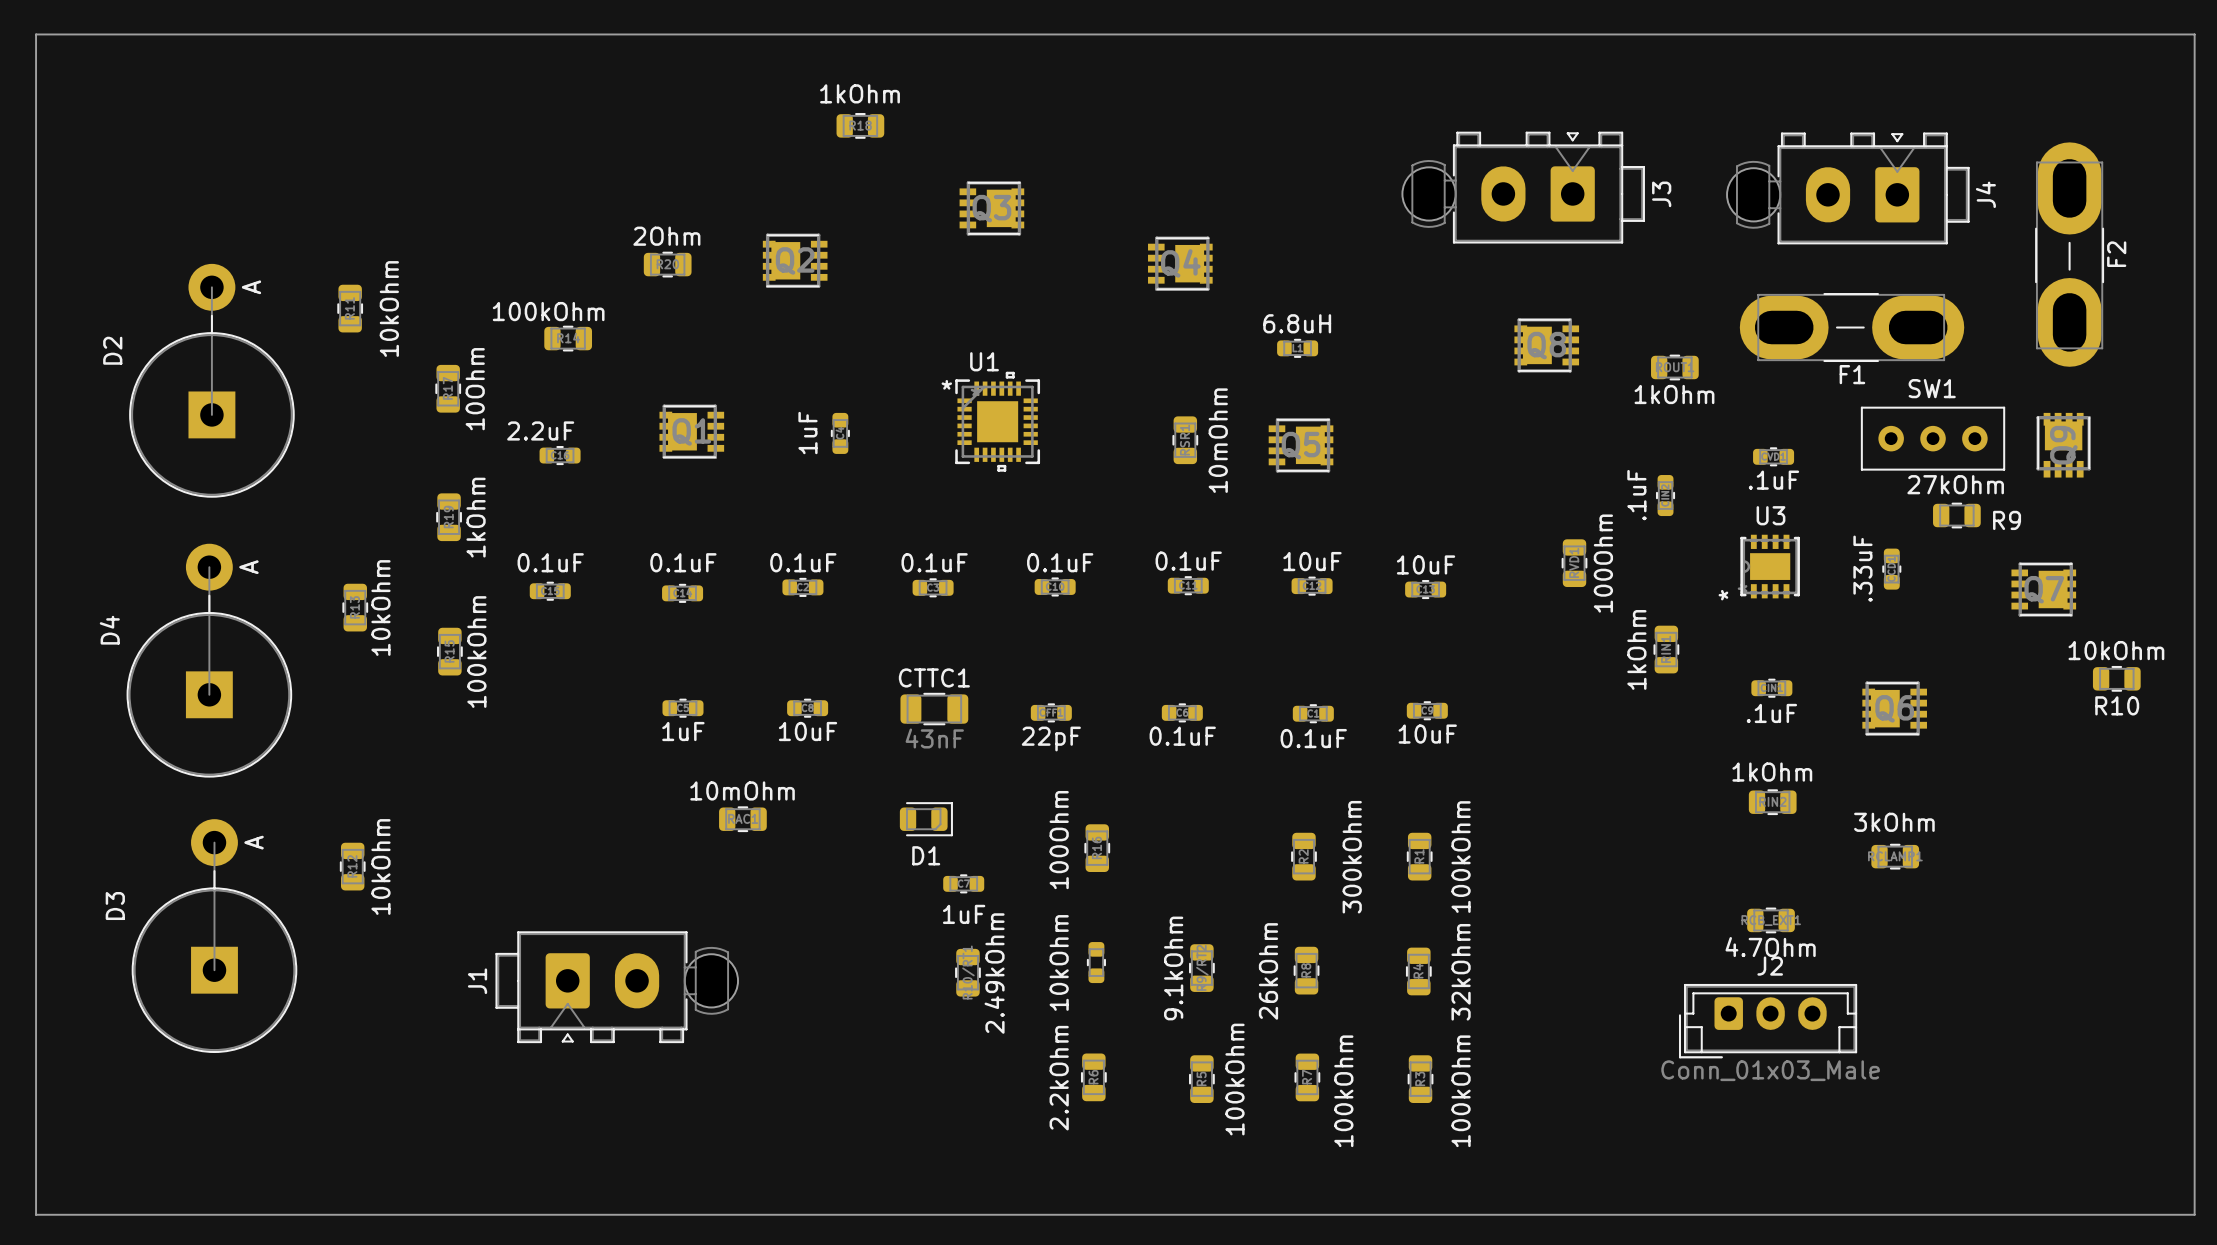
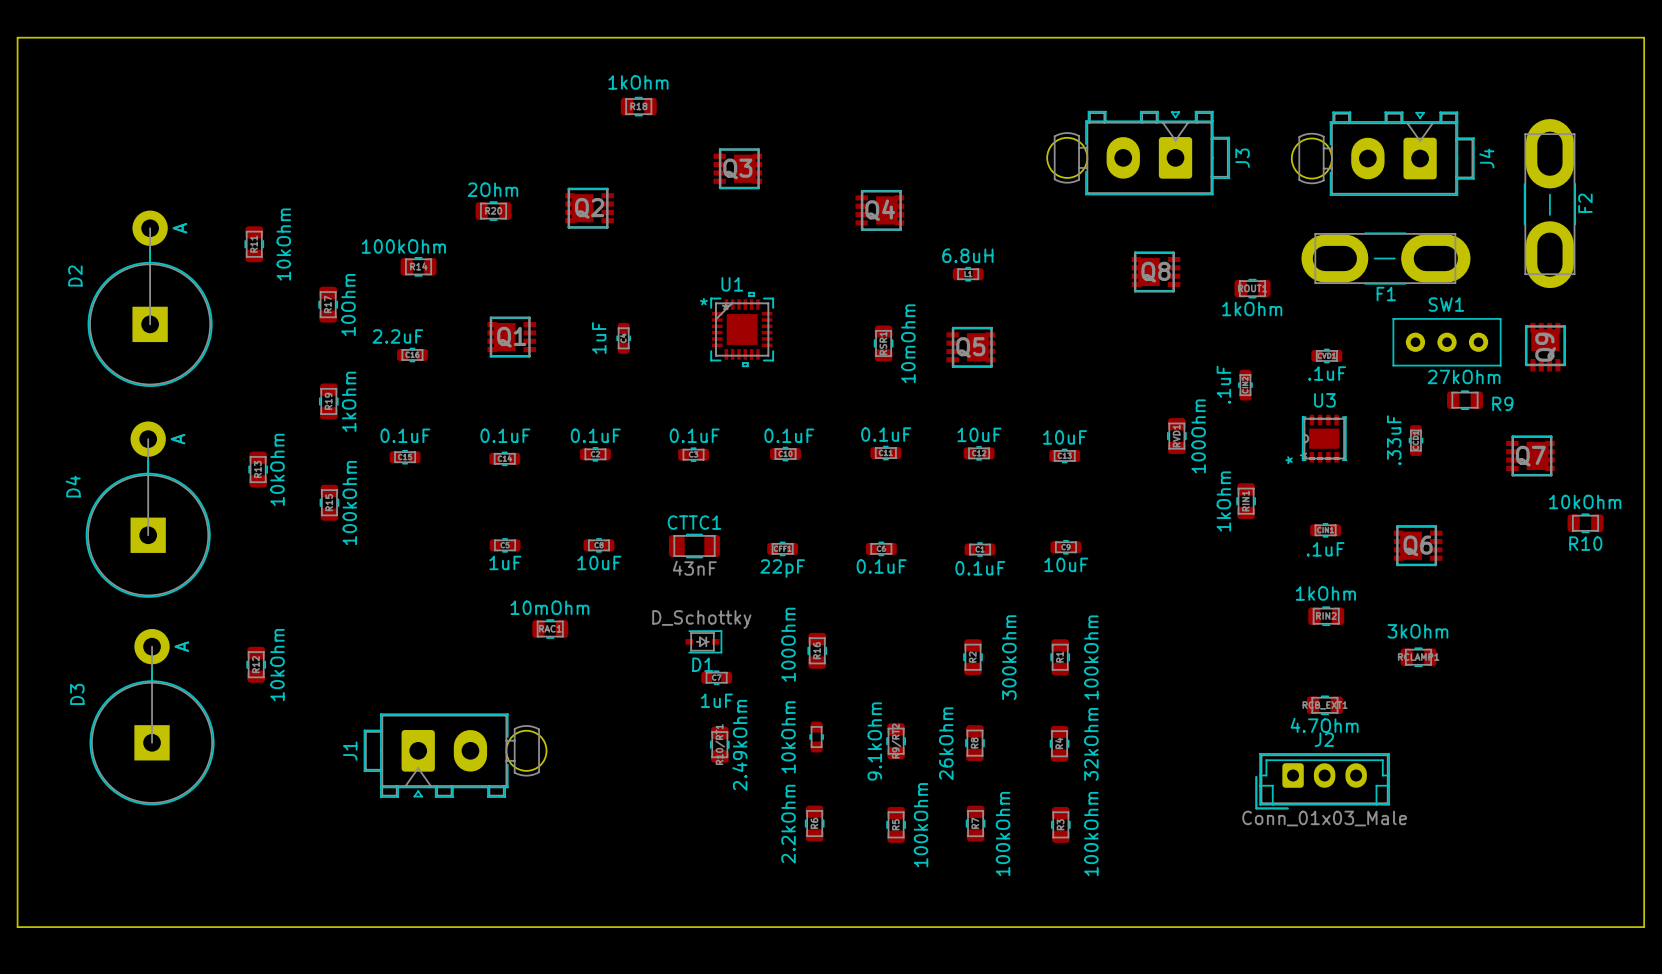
D1 footprint: [899, 802, 953, 837] -> [685, 630, 723, 654]
D1 value: none -> D_Schottky (701, 619)

